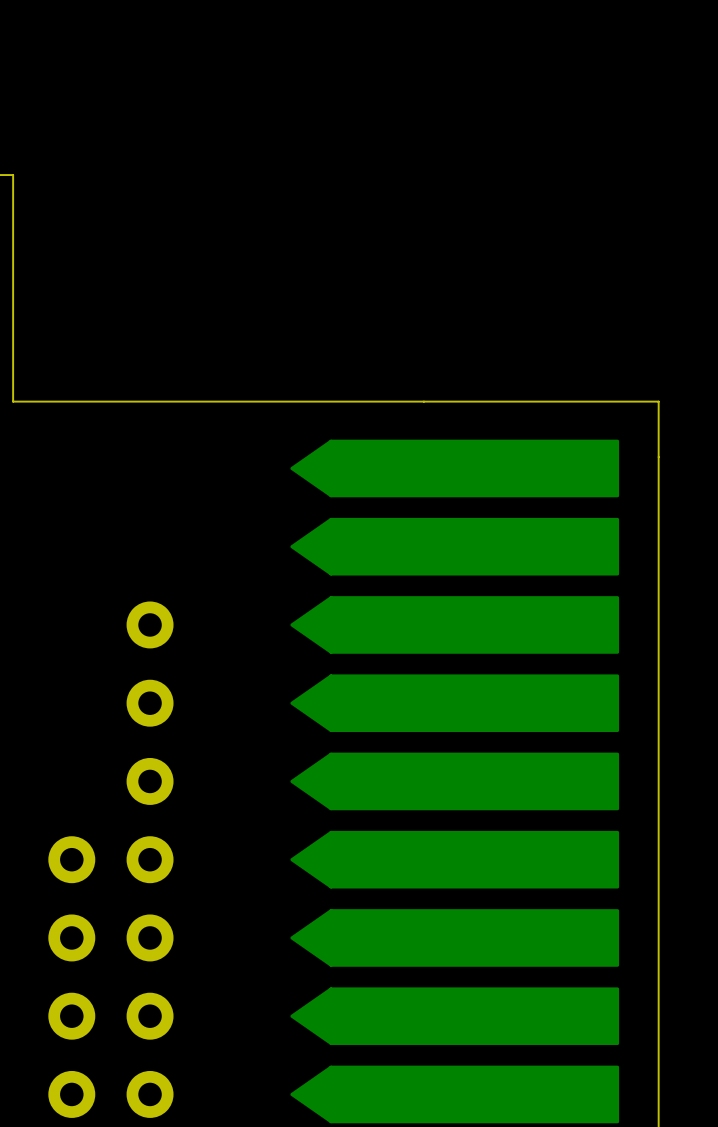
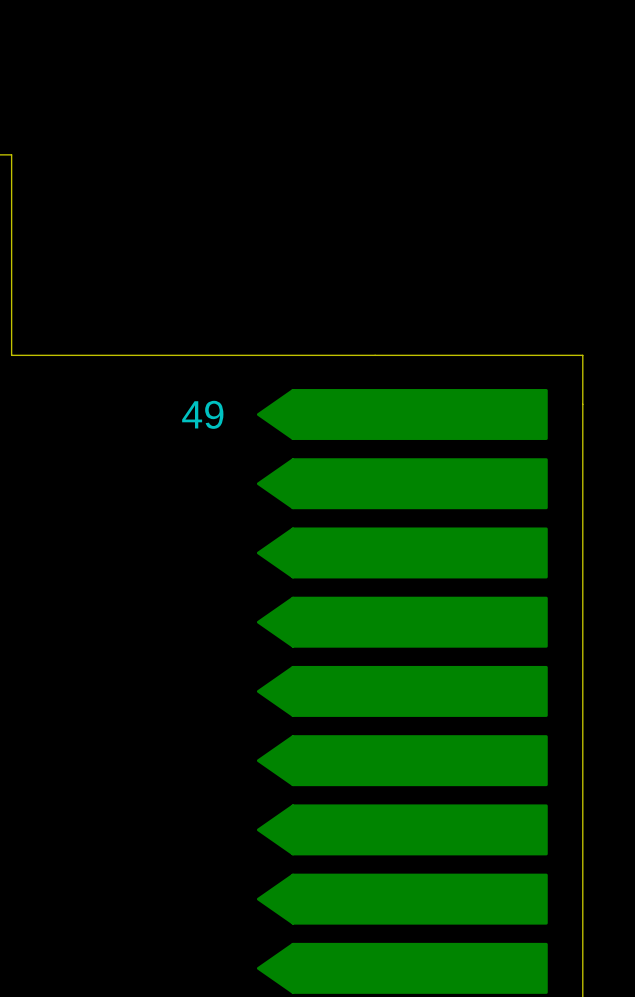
text: none -> 49 (202, 414)
part: (150, 624) -> none
part: (150, 703) -> none
part: (150, 781) -> none
part: (71, 859) -> none
part: (150, 859) -> none
part: (71, 937) -> none
part: (150, 937) -> none
part: (71, 1016) -> none
part: (150, 1016) -> none
part: (71, 1094) -> none
part: (150, 1094) -> none

